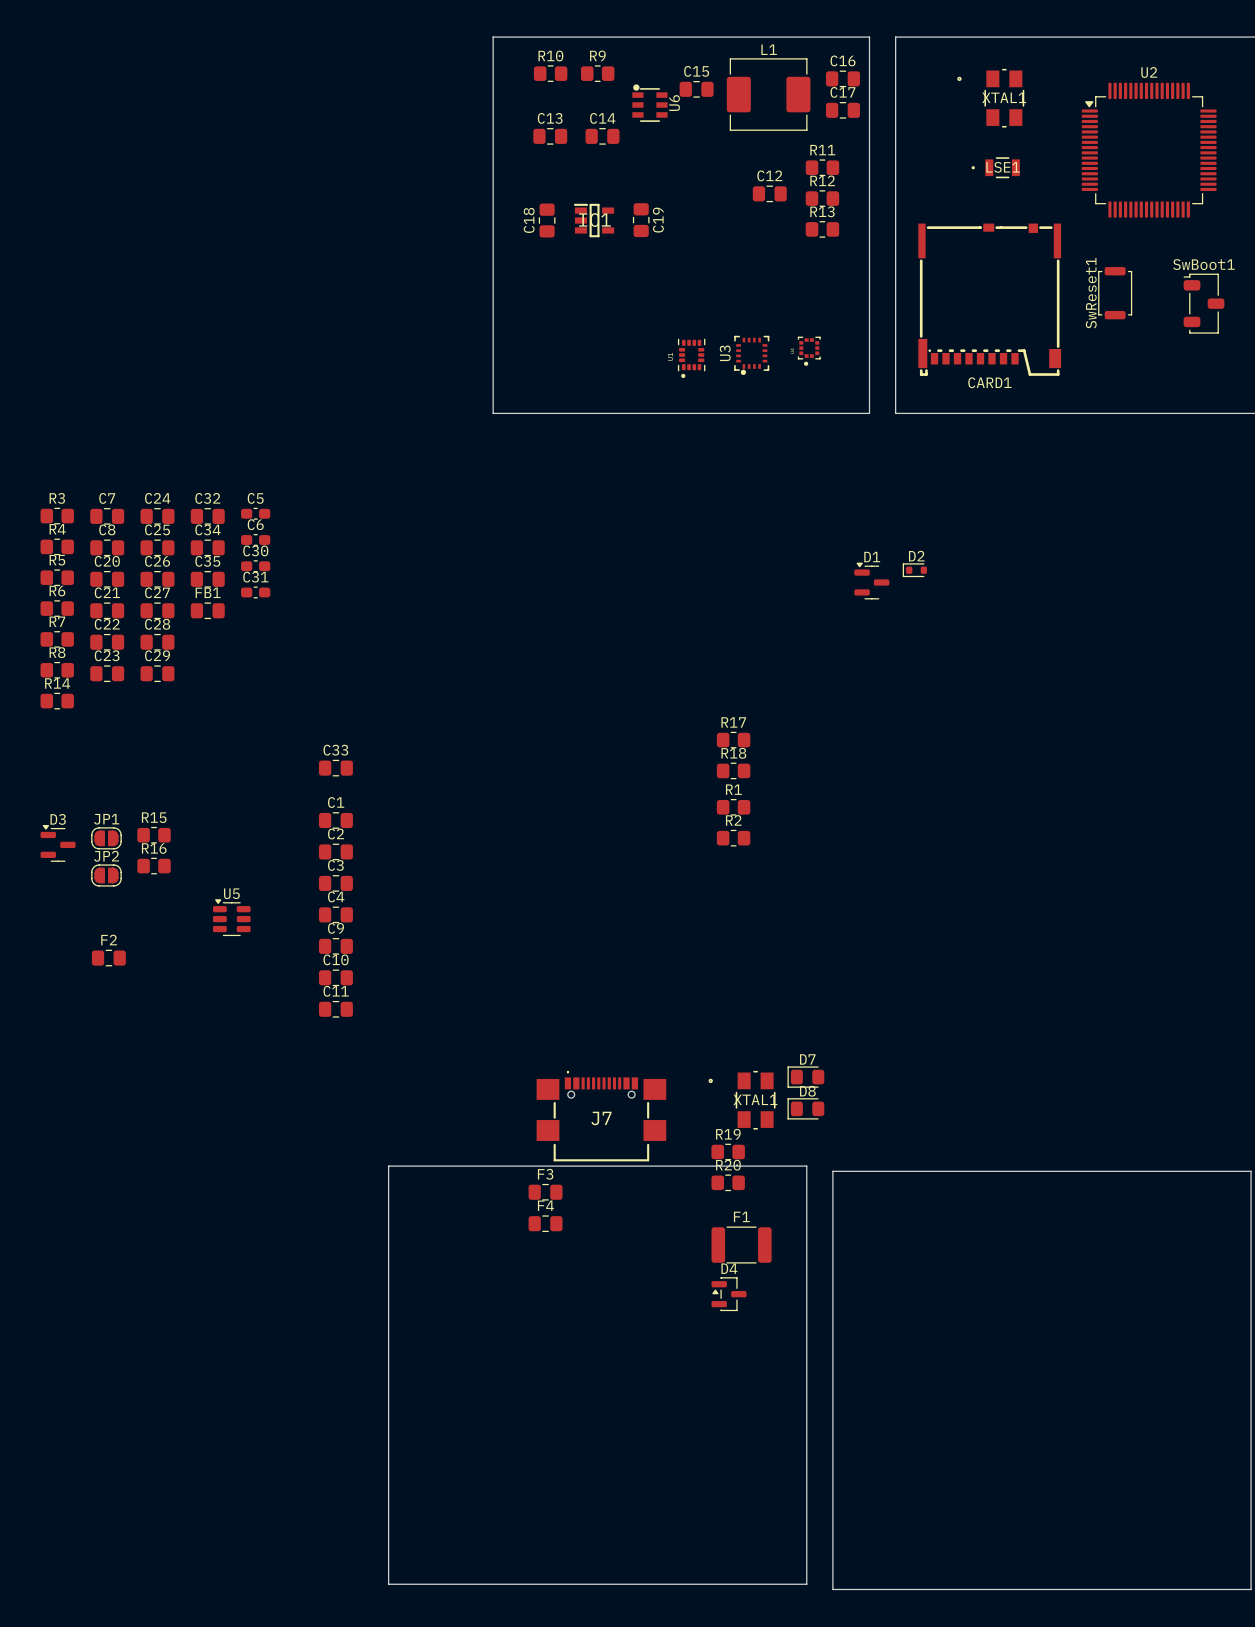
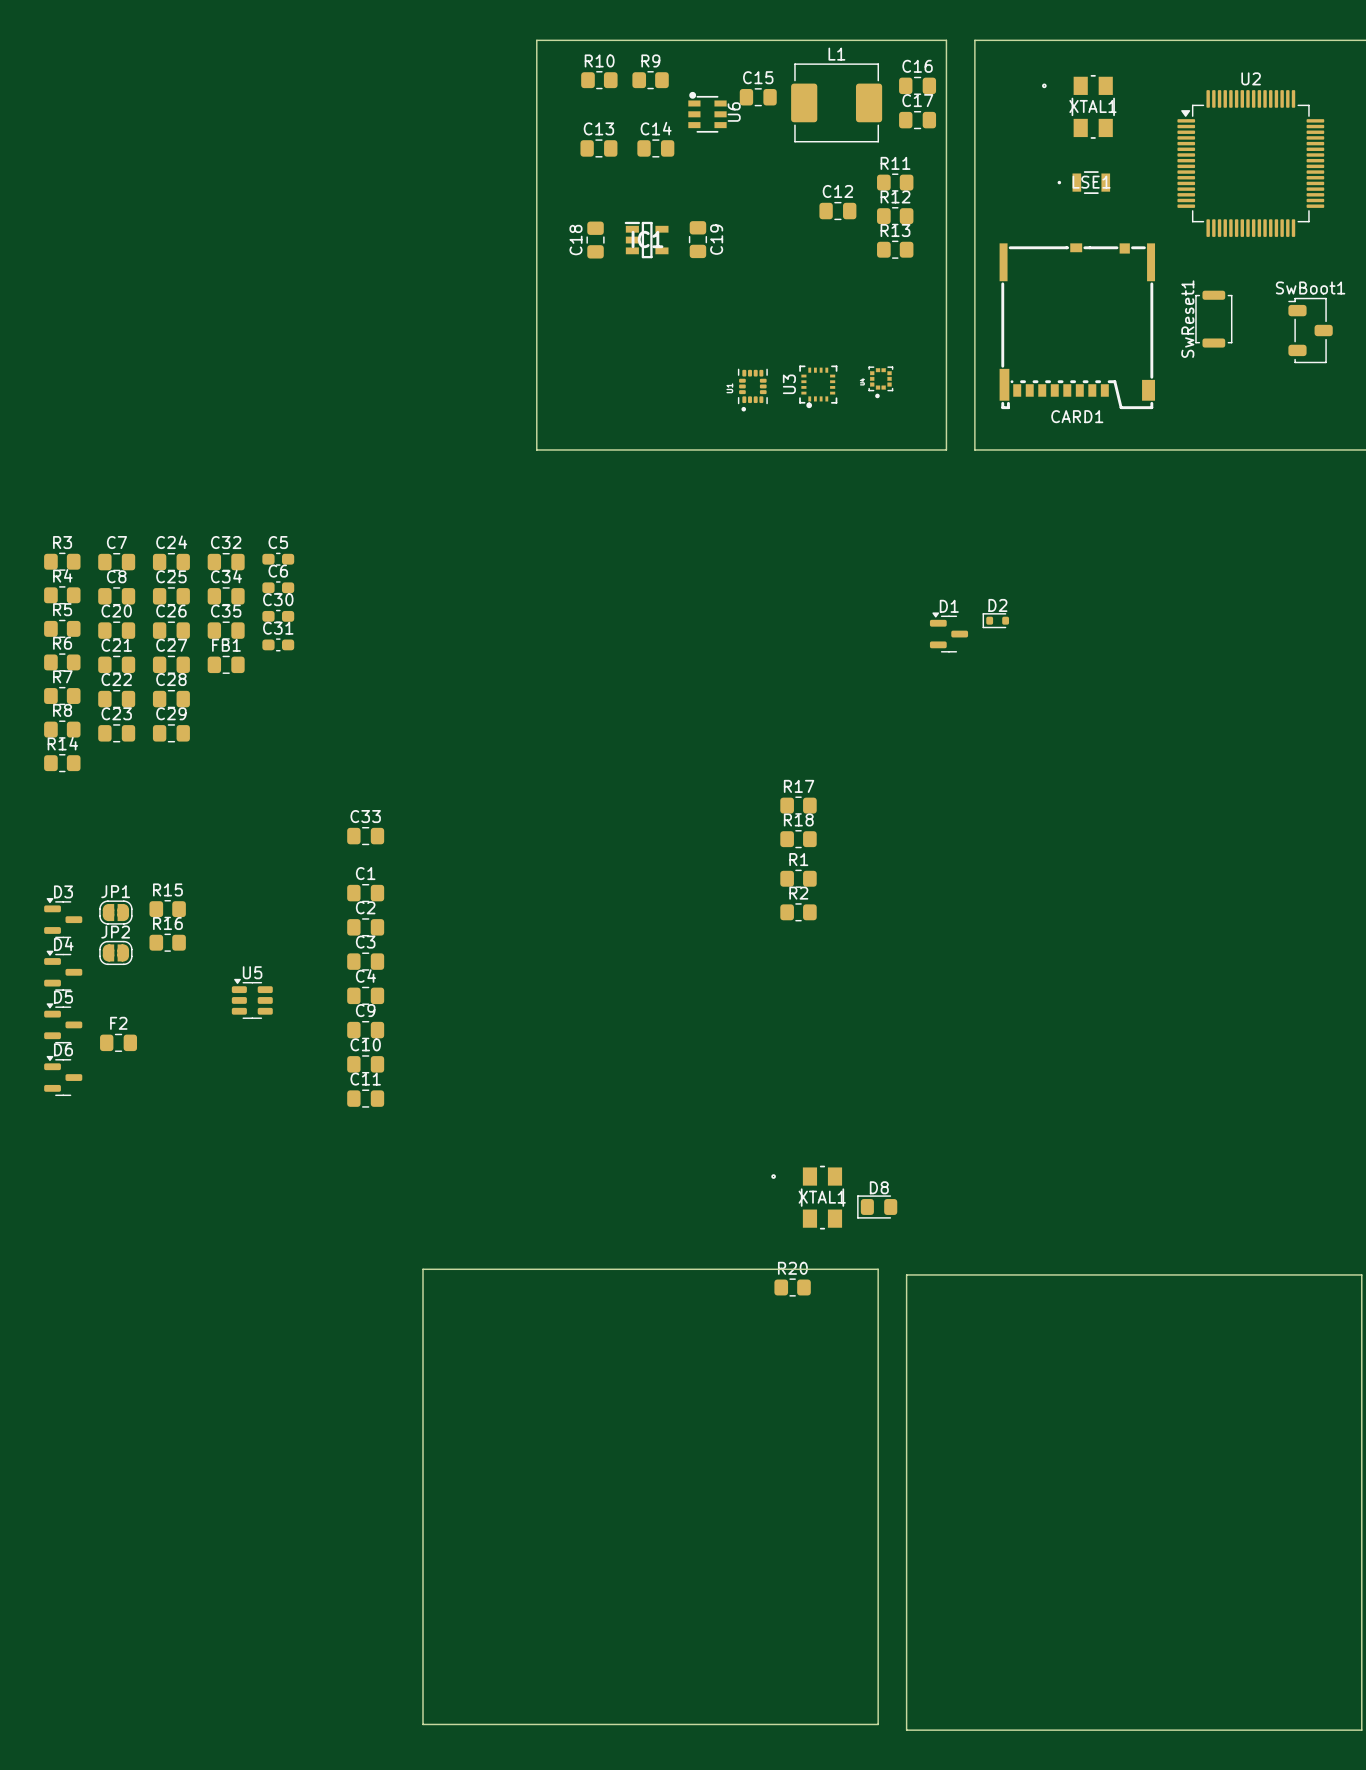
D5: none -> (63, 1023)
D6: none -> (63, 1075)
D7: (805, 1077) -> none
J7: (601, 1116) -> none
R19: (728, 1151) -> none
F3: (545, 1192) -> none
F4: (545, 1223) -> none
F1: (741, 1245) -> none
D4 footprint: [711, 1277, 747, 1312] -> [44, 950, 83, 991]

